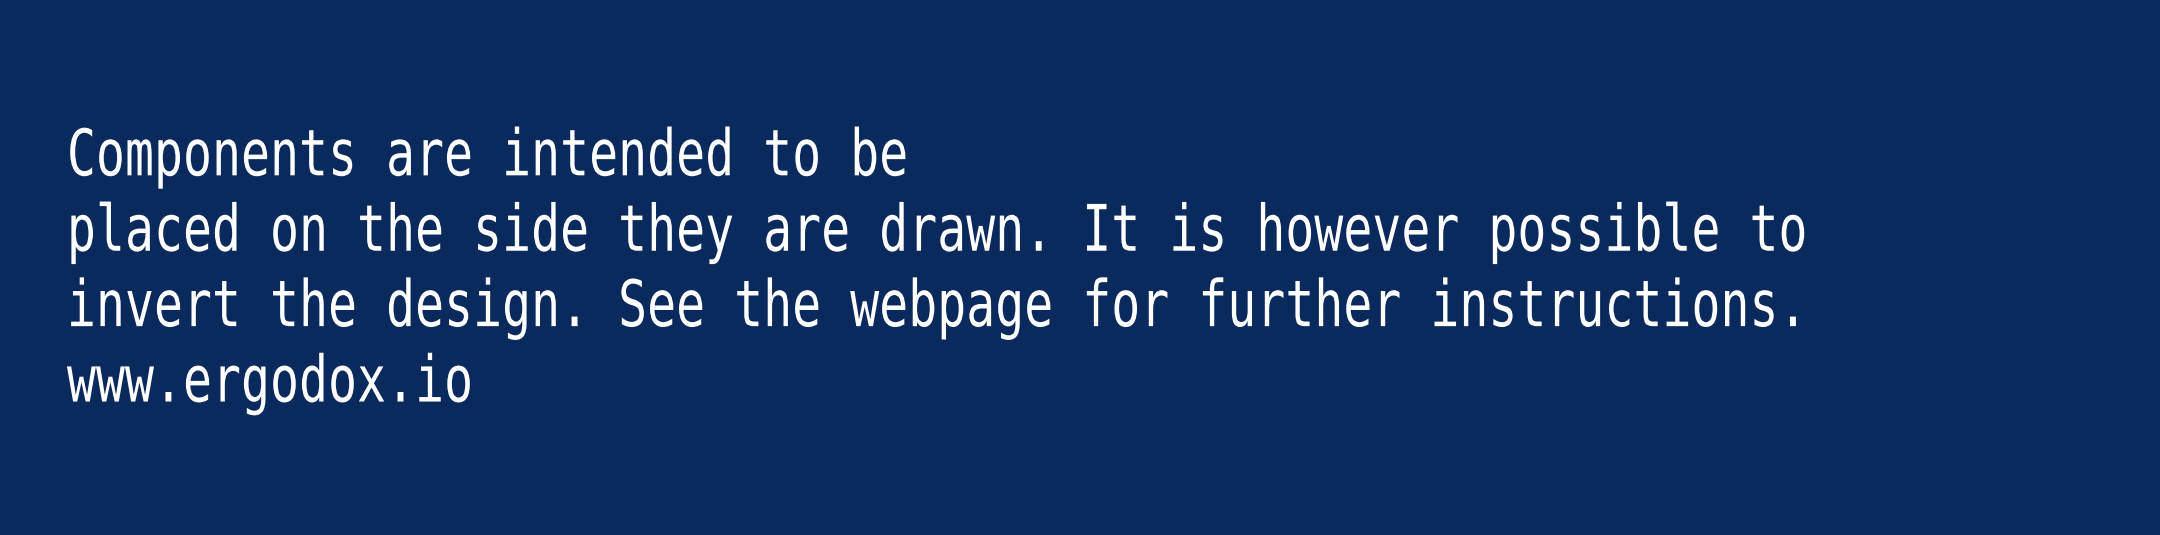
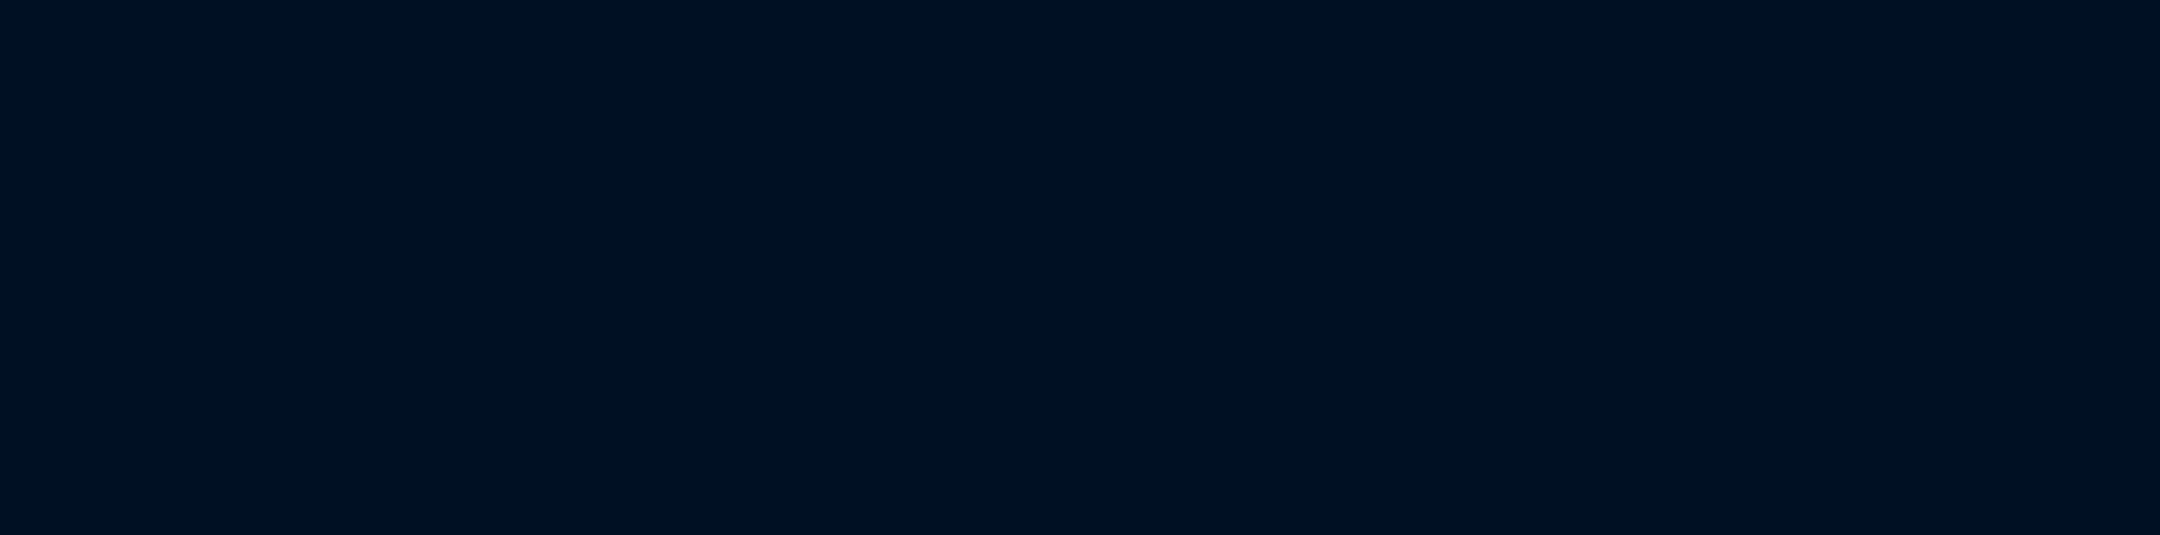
text: Components are intended to be (487, 157) -> none
text: placed on the side they are drawn. It is however possible to (937, 232) -> none
text: invert the design. See the webpage for further instructions. (933, 308) -> none
text: www.ergodox.io (268, 384) -> none

